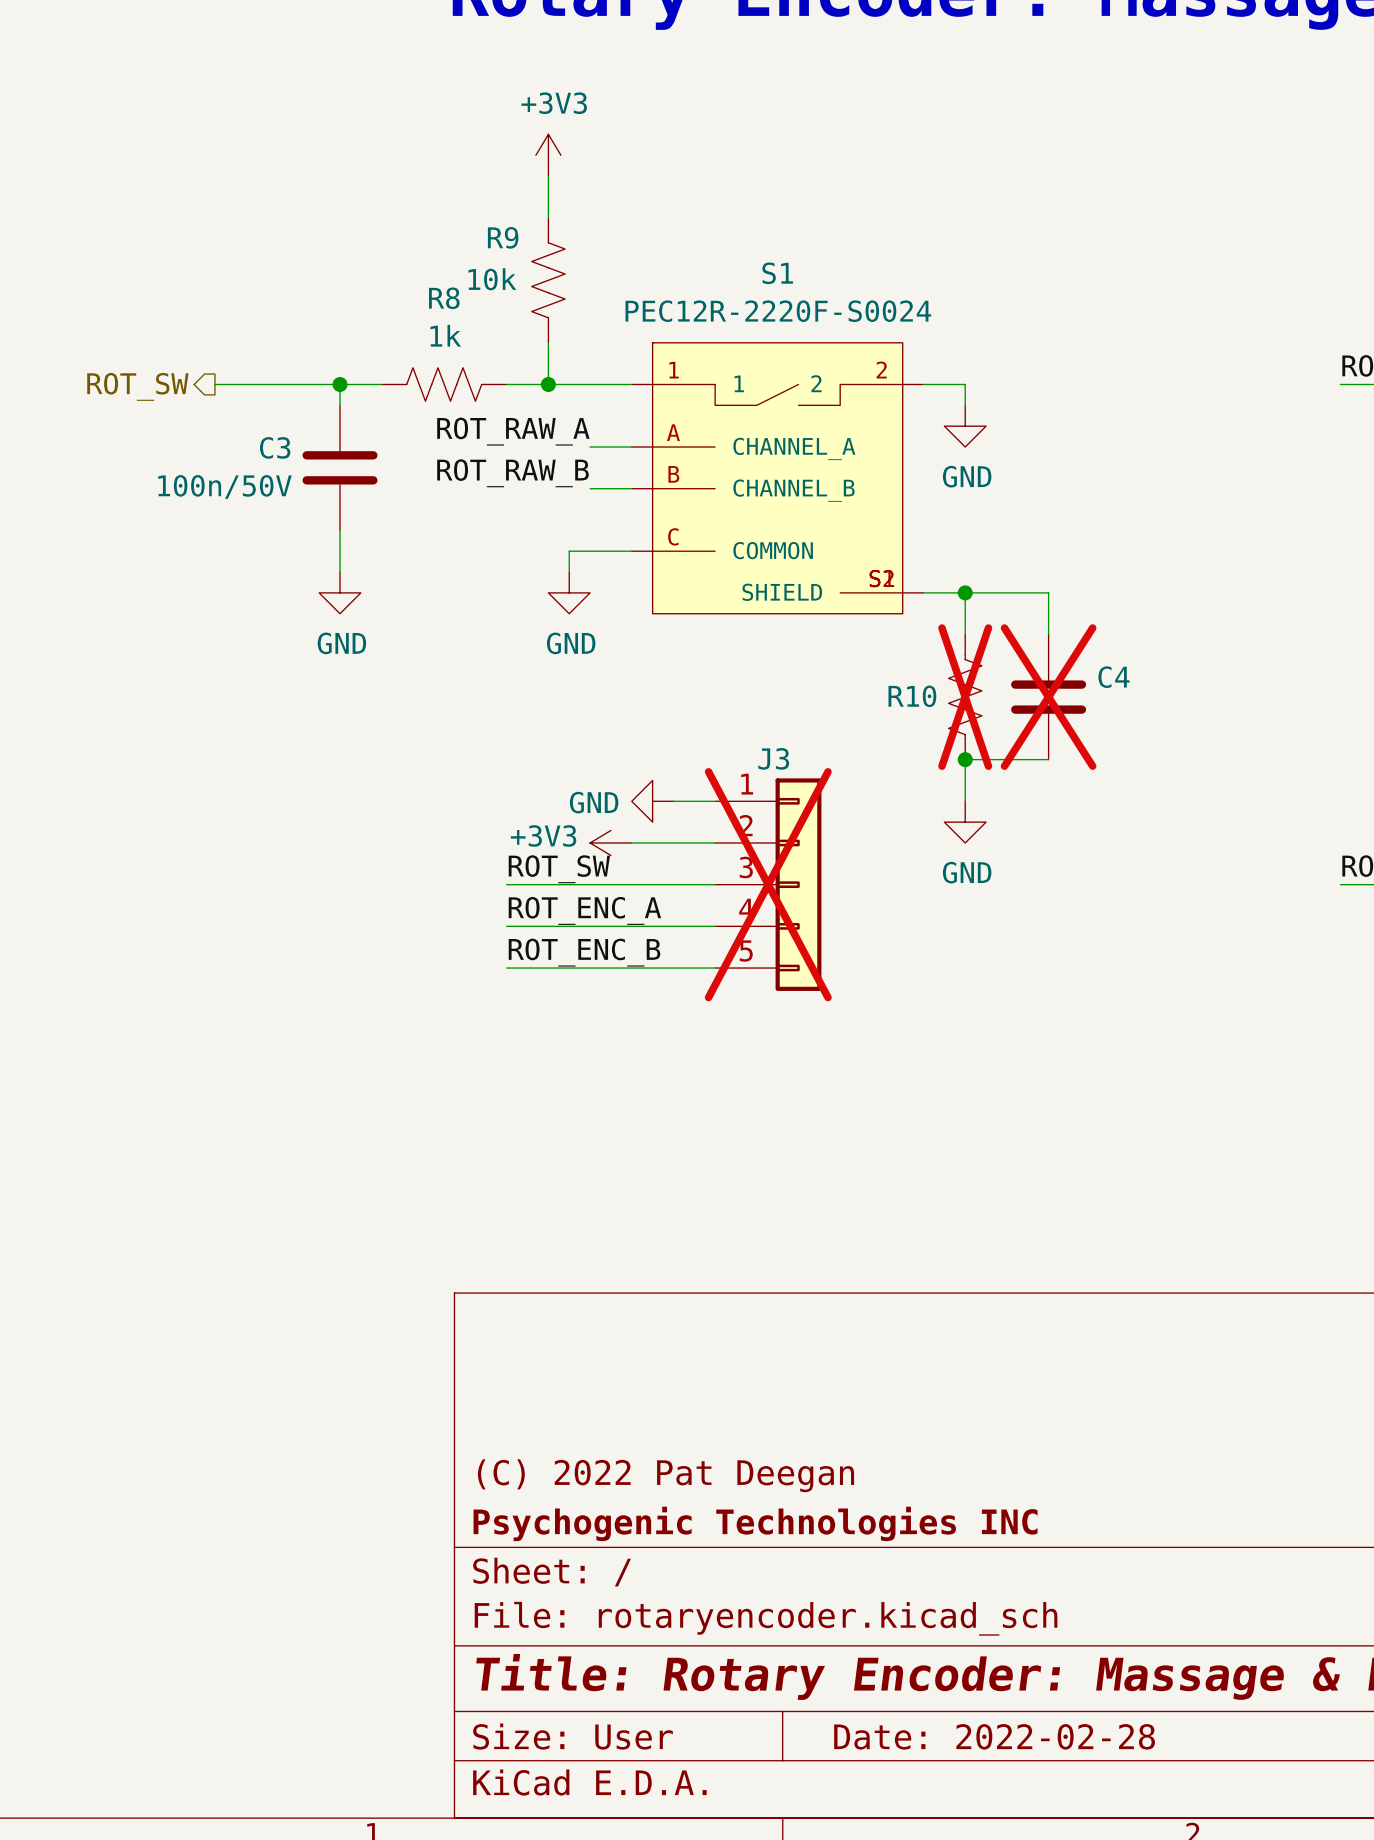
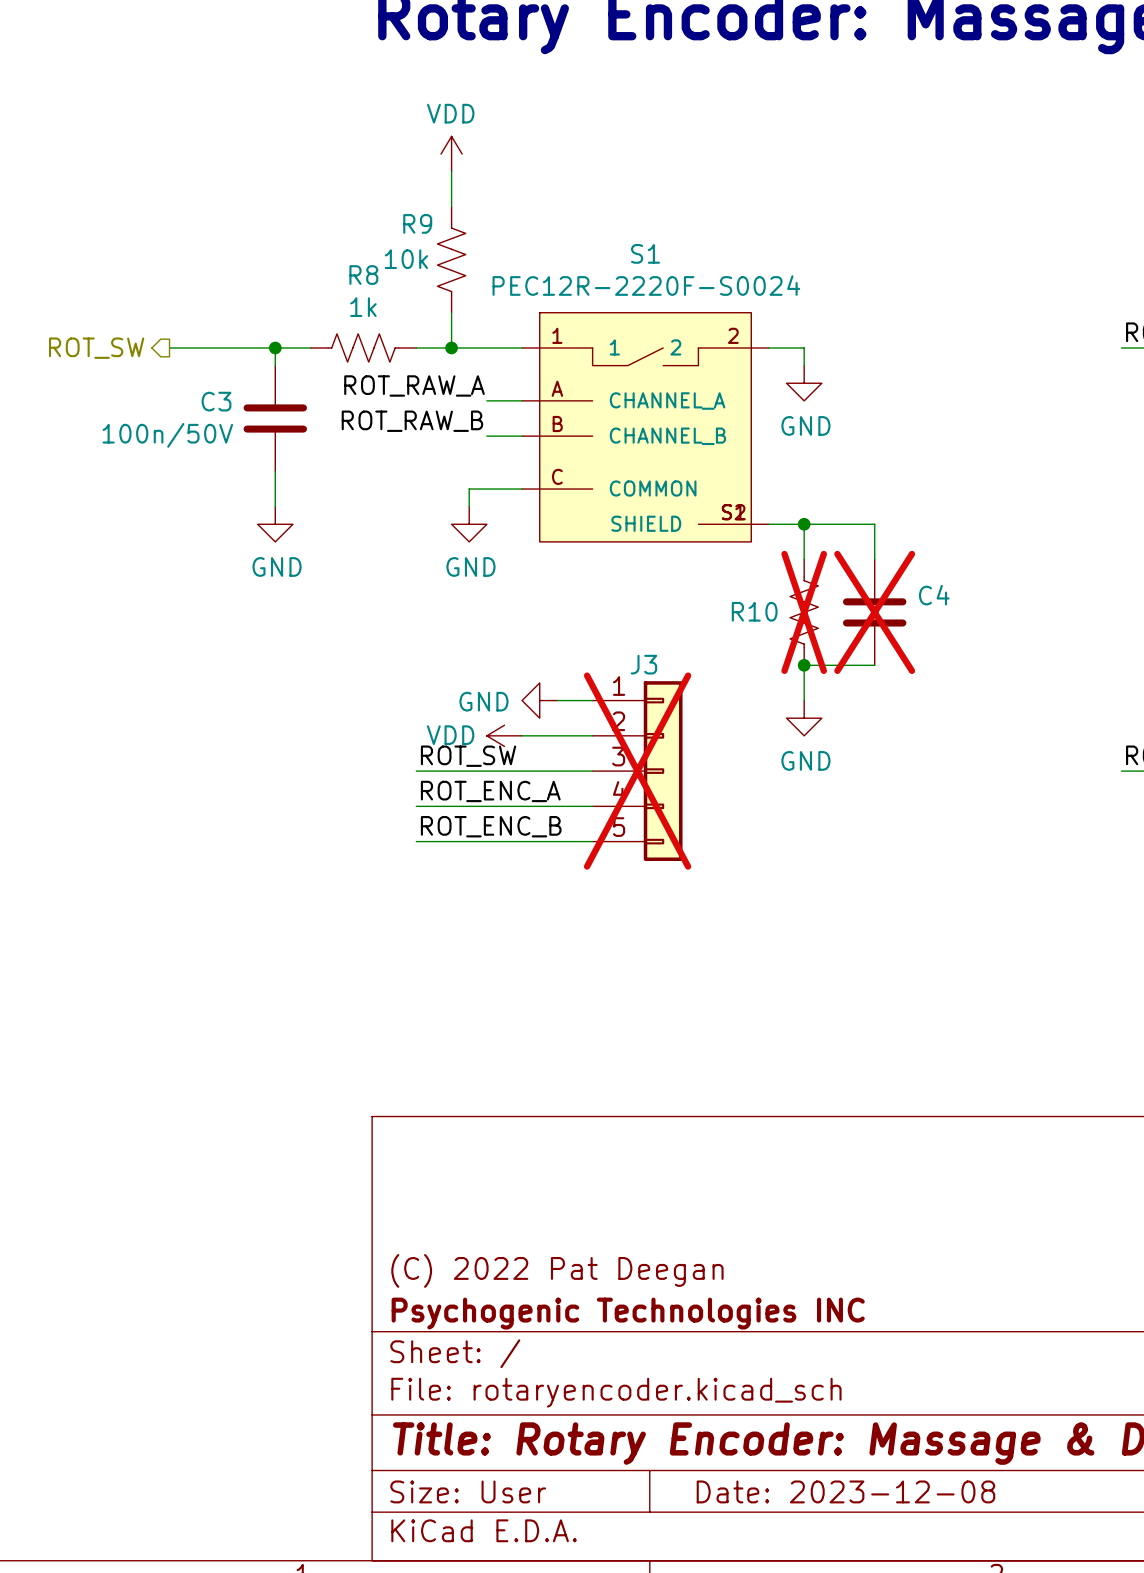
power symbol: +3V3 (548, 155) -> VDD (451, 154)
power symbol: +3V3 (610, 842) -> VDD (504, 735)
title block: Date: 2022-02-28 (994, 1736) -> Date: 2023-12-08 (845, 1491)

